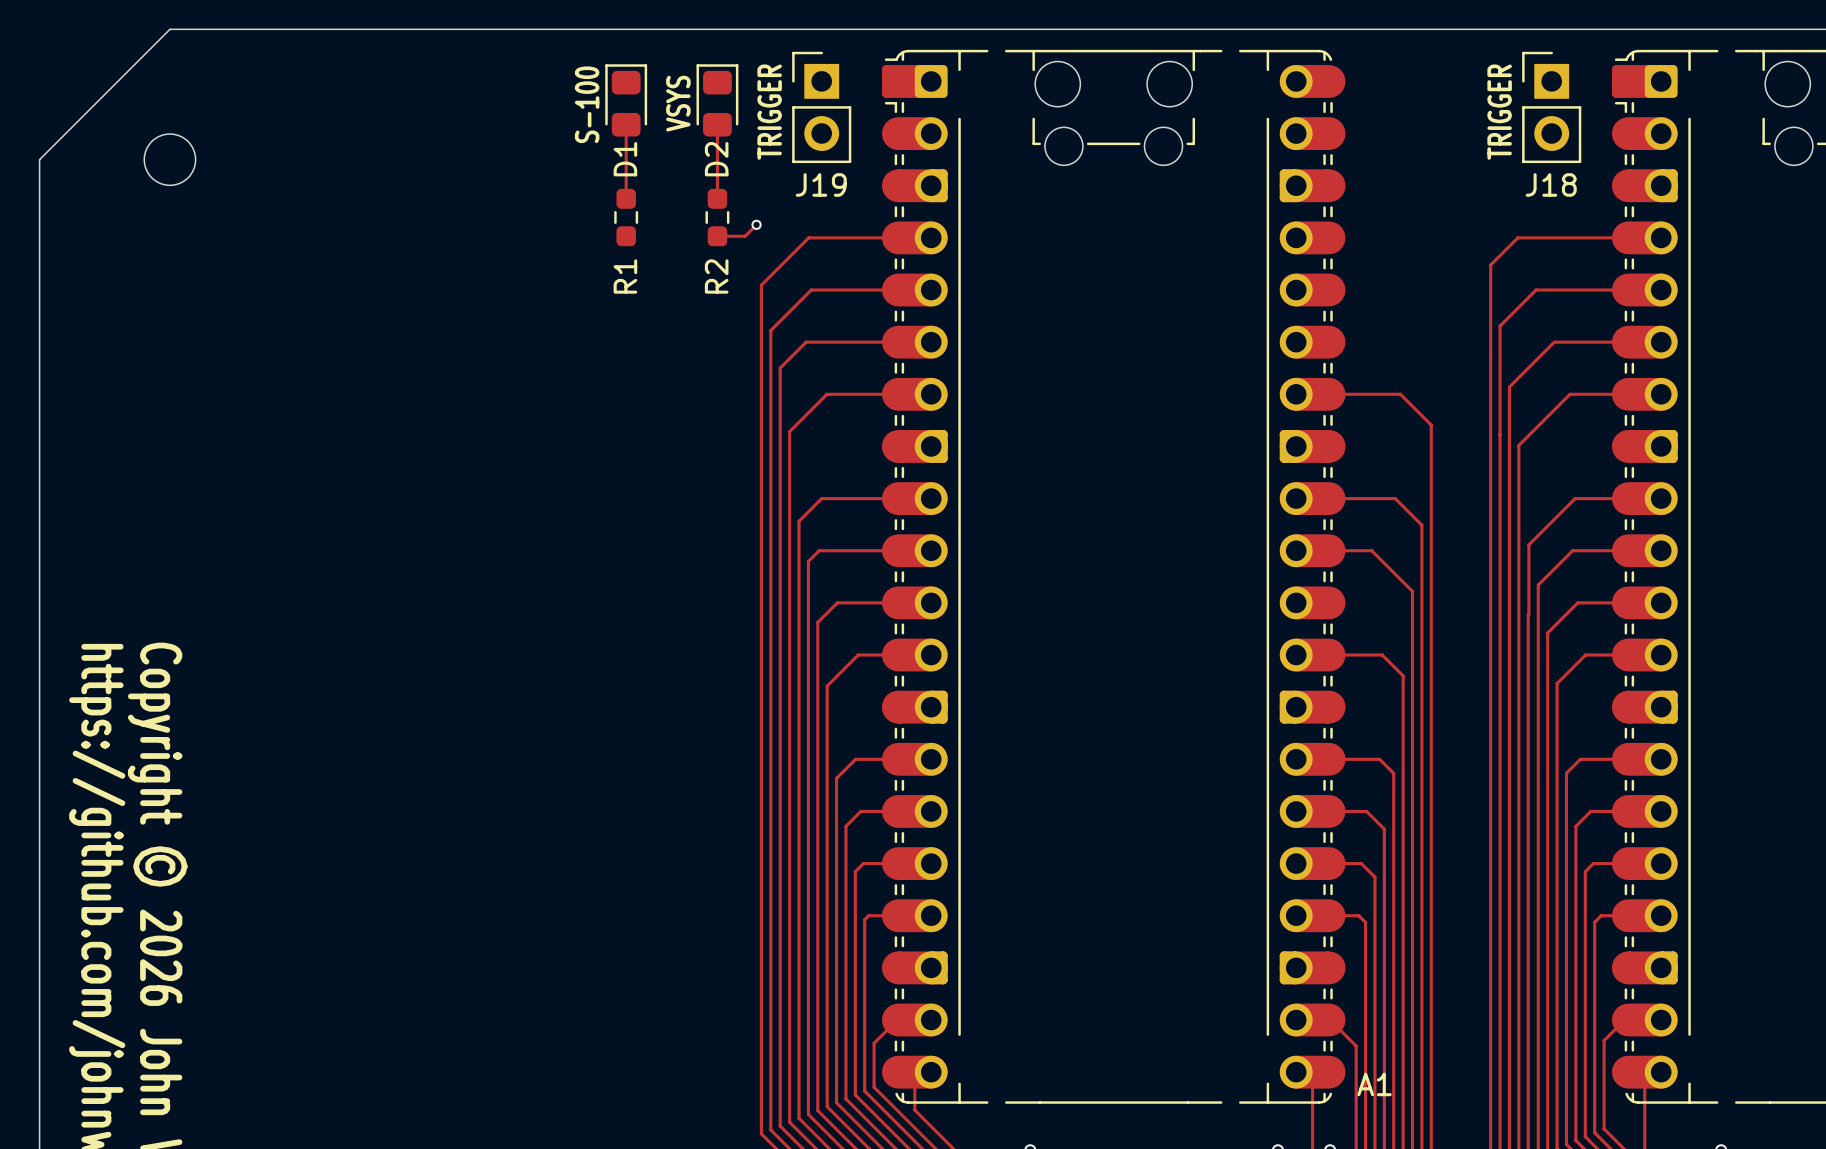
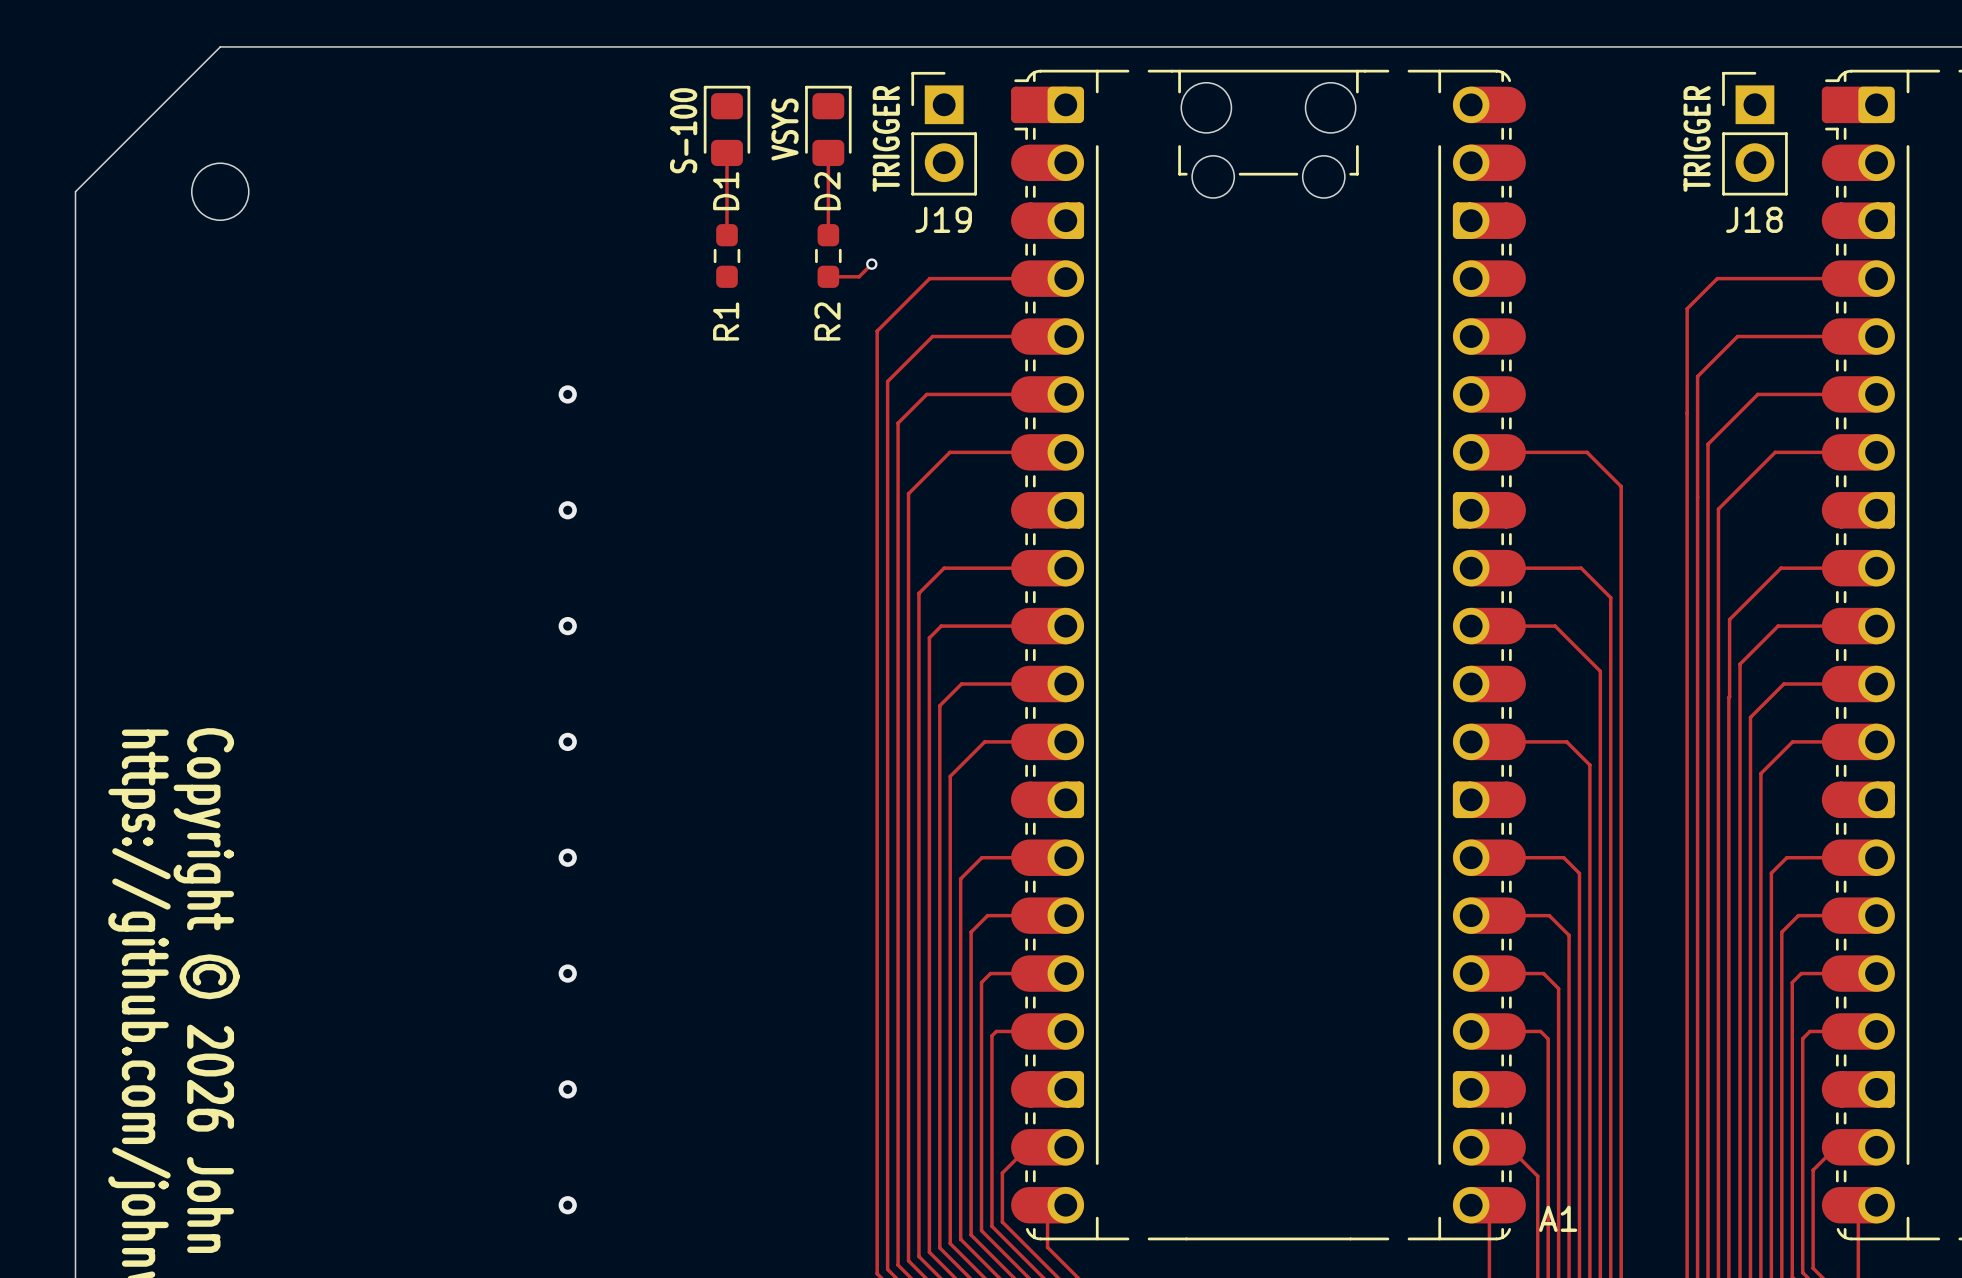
via: none -> (567, 394)
via: none -> (567, 510)
via: none -> (567, 626)
via: none -> (567, 741)
via: none -> (567, 857)
via: none -> (567, 973)
via: none -> (567, 1089)
via: none -> (567, 1205)

